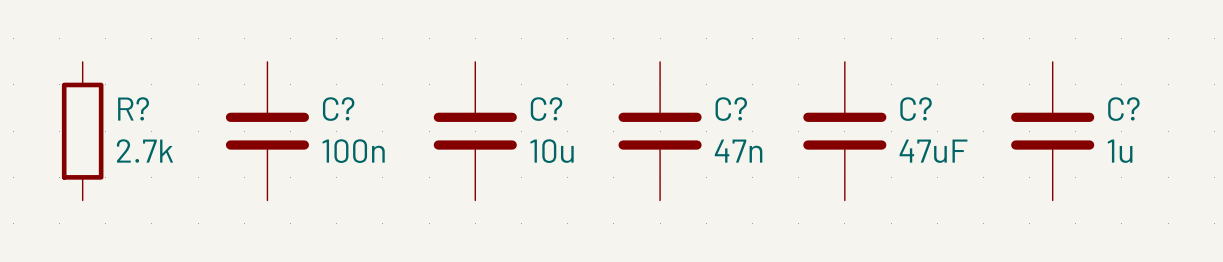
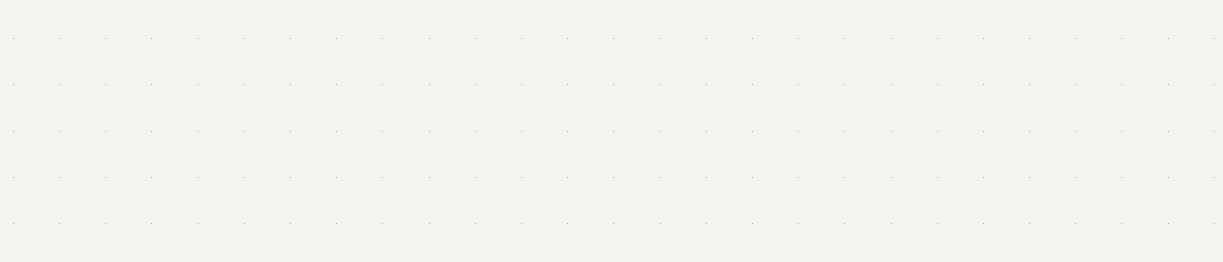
R?: 2.7k (82, 131) -> none
C?: 100n (267, 131) -> none
C?: 10u (475, 131) -> none
C?: 47n (660, 131) -> none
C?: 47uF (844, 131) -> none
C?: 1u (1052, 131) -> none

